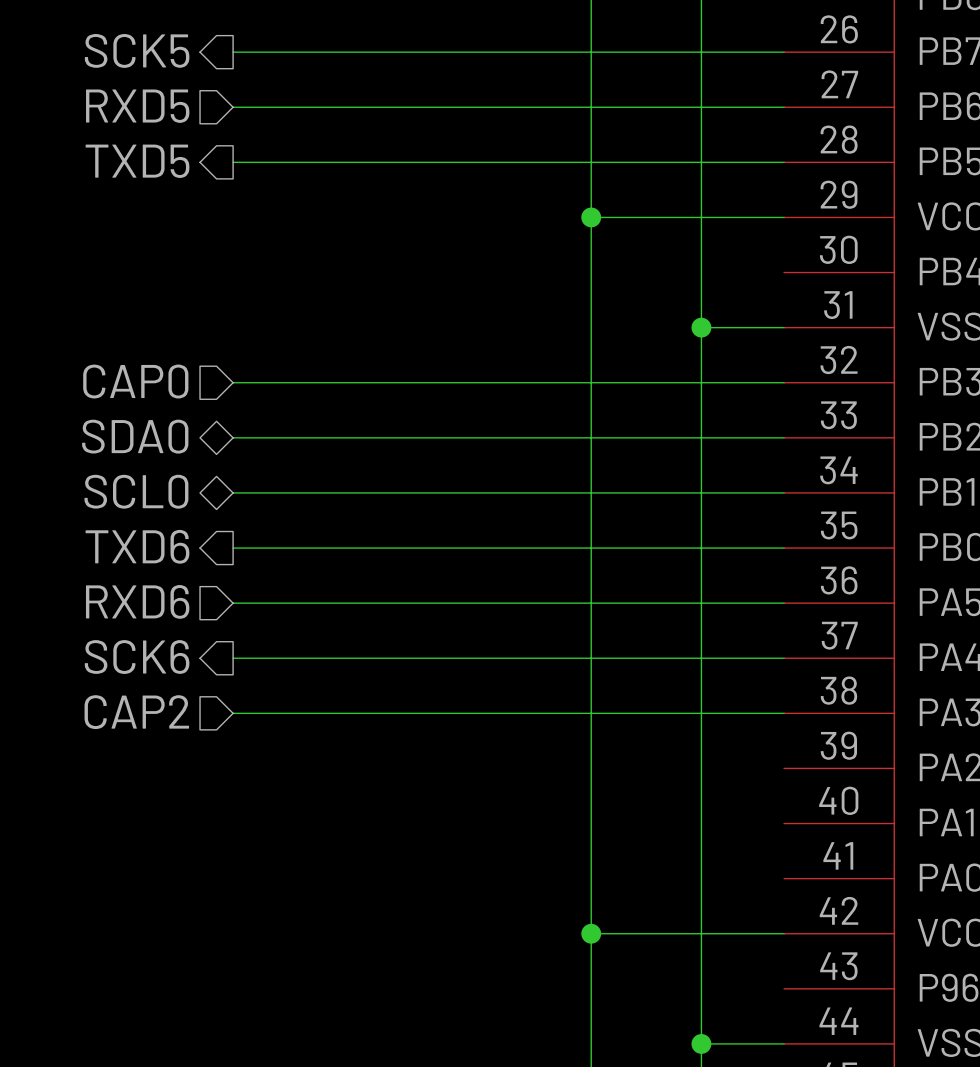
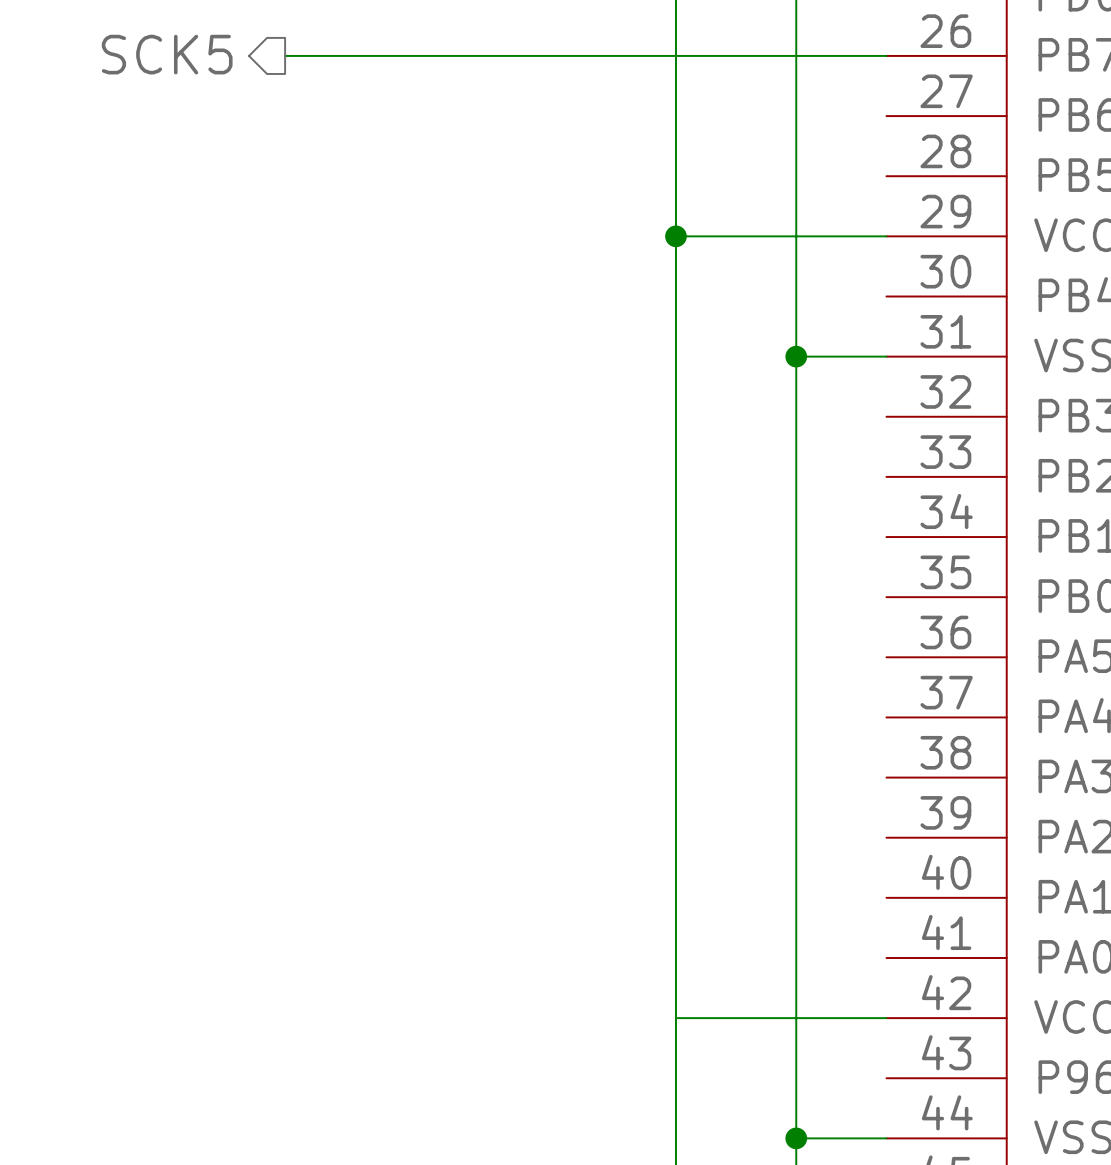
hierarchical label: RXD5 (137, 106) -> none
wire: (233, 107) (784, 107) -> none
hierarchical label: TXD5 (137, 161) -> none
wire: (233, 162) (784, 162) -> none
hierarchical label: CAP0 (135, 381) -> none
wire: (233, 382) (784, 382) -> none
hierarchical label: SDA0 (135, 436) -> none
wire: (233, 437) (784, 437) -> none
hierarchical label: SCL0 (136, 491) -> none
wire: (233, 492) (784, 492) -> none
hierarchical label: TXD6 (137, 546) -> none
wire: (233, 548) (784, 548) -> none
hierarchical label: RXD6 (137, 601) -> none
wire: (233, 603) (784, 603) -> none
hierarchical label: SCK6 (137, 657) -> none
wire: (233, 658) (784, 658) -> none
hierarchical label: CAP2 (136, 712) -> none
wire: (233, 713) (784, 713) -> none
junction: (591, 933) -> none

